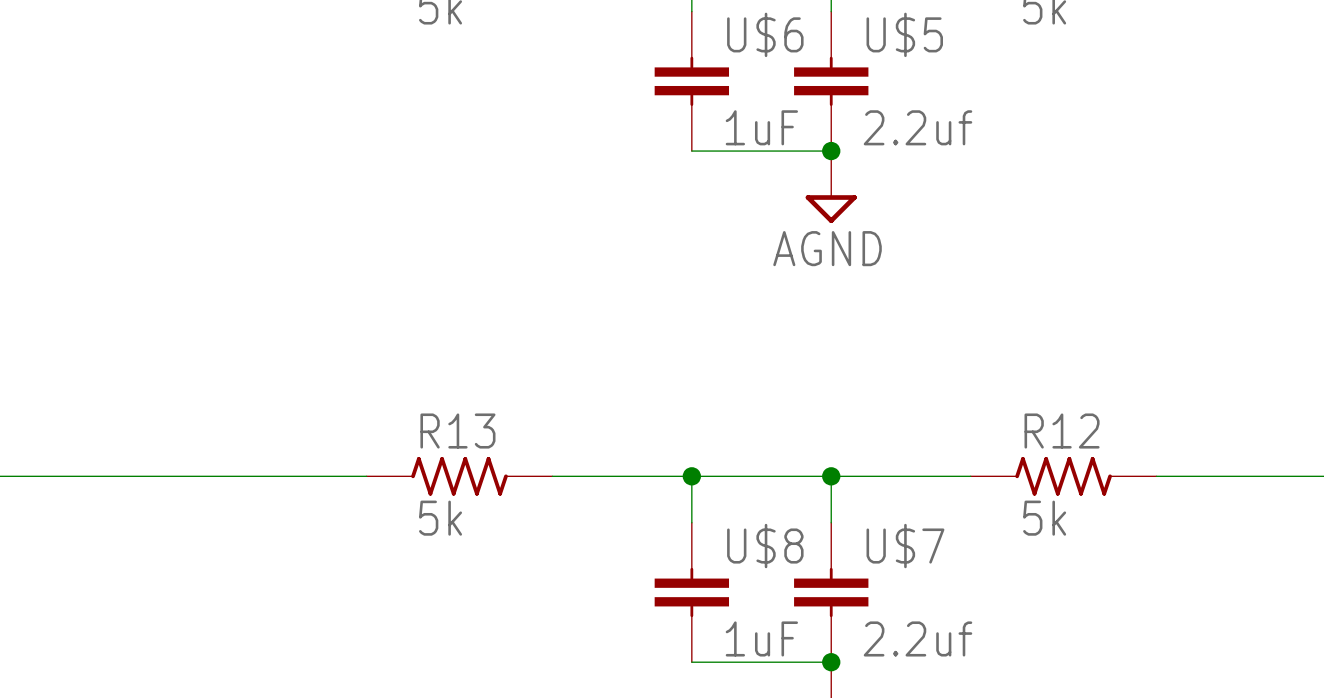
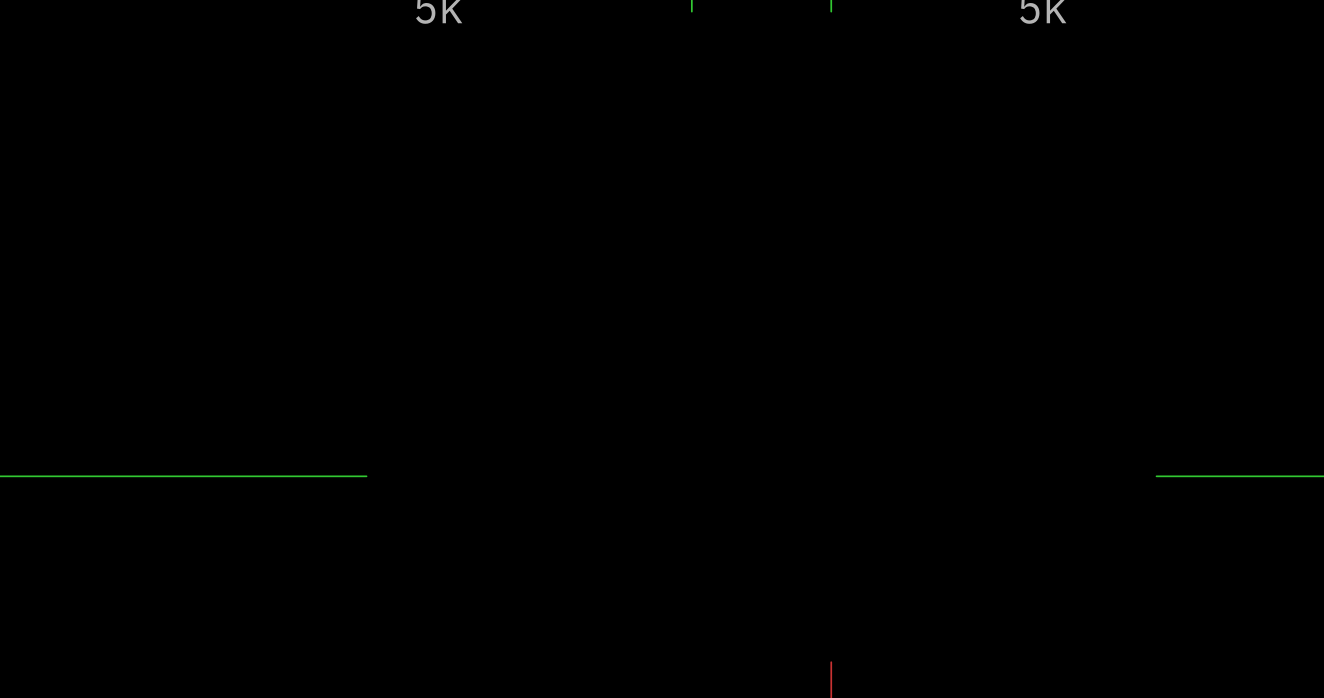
U$6: 1uF (691, 81) -> none
U$5: 2.2uf (831, 81) -> none
wire: (691, 151) (831, 151) -> none
junction: (831, 151) -> none
power symbol: AGND (831, 187) -> none
R13: 5k (459, 476) -> none
wire: (552, 476) (970, 476) -> none
wire: (691, 476) (691, 522) -> none
junction: (691, 476) -> none
wire: (831, 476) (831, 522) -> none
junction: (831, 476) -> none
R12: 5k (1063, 476) -> none
U$8: 1uF (691, 592) -> none
U$7: 2.2uf (831, 592) -> none
wire: (691, 662) (831, 662) -> none
junction: (831, 662) -> none

